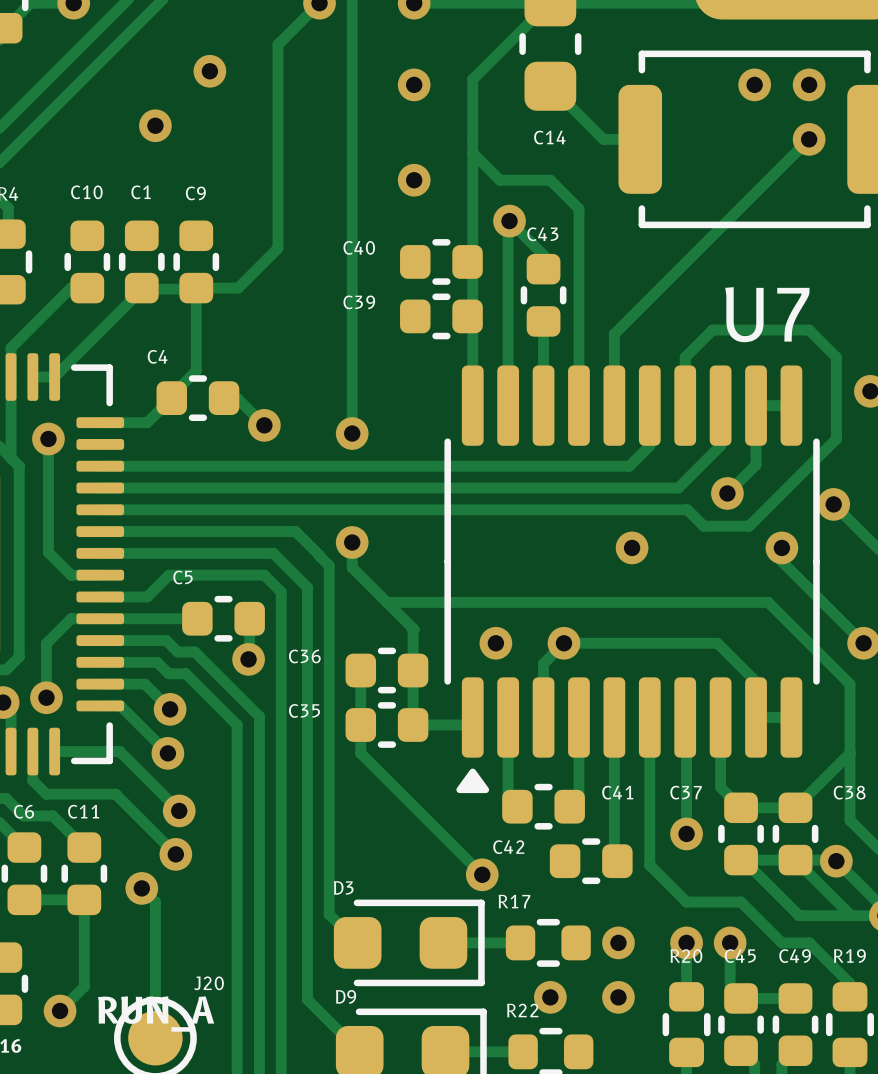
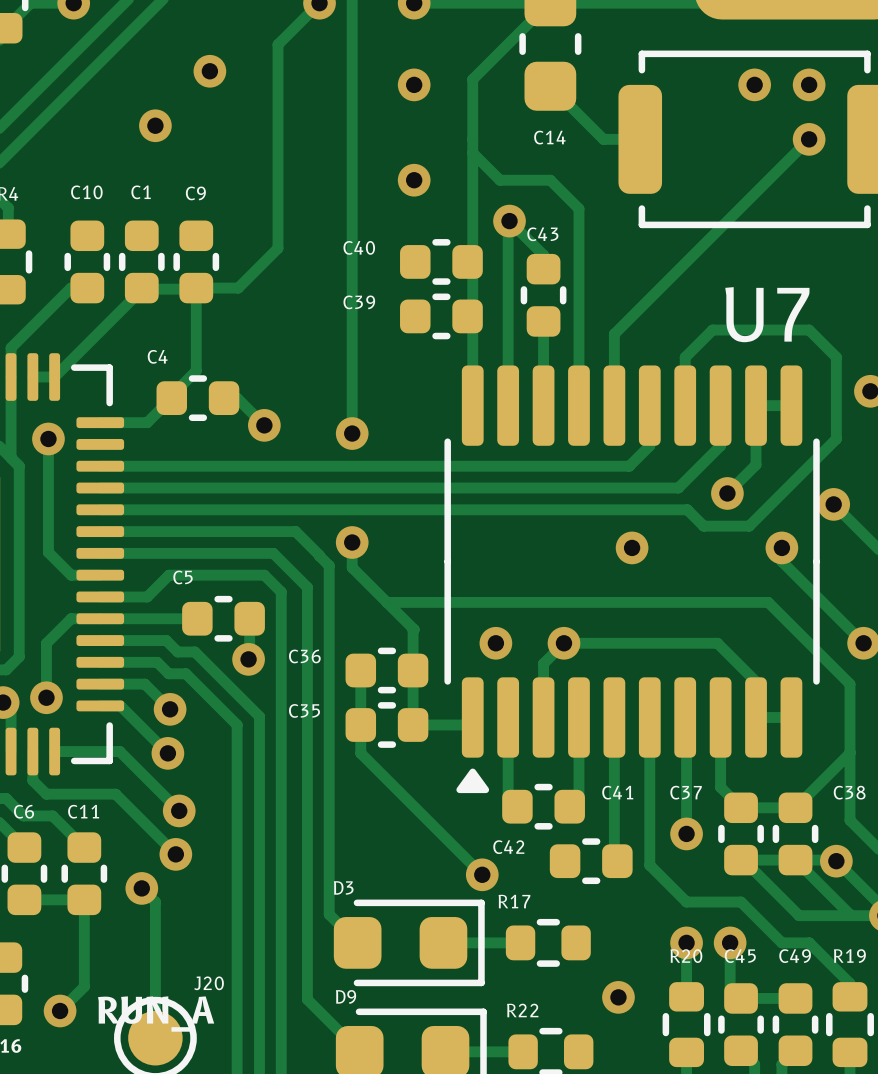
via: (618, 942) -> none
via: (550, 997) -> none

